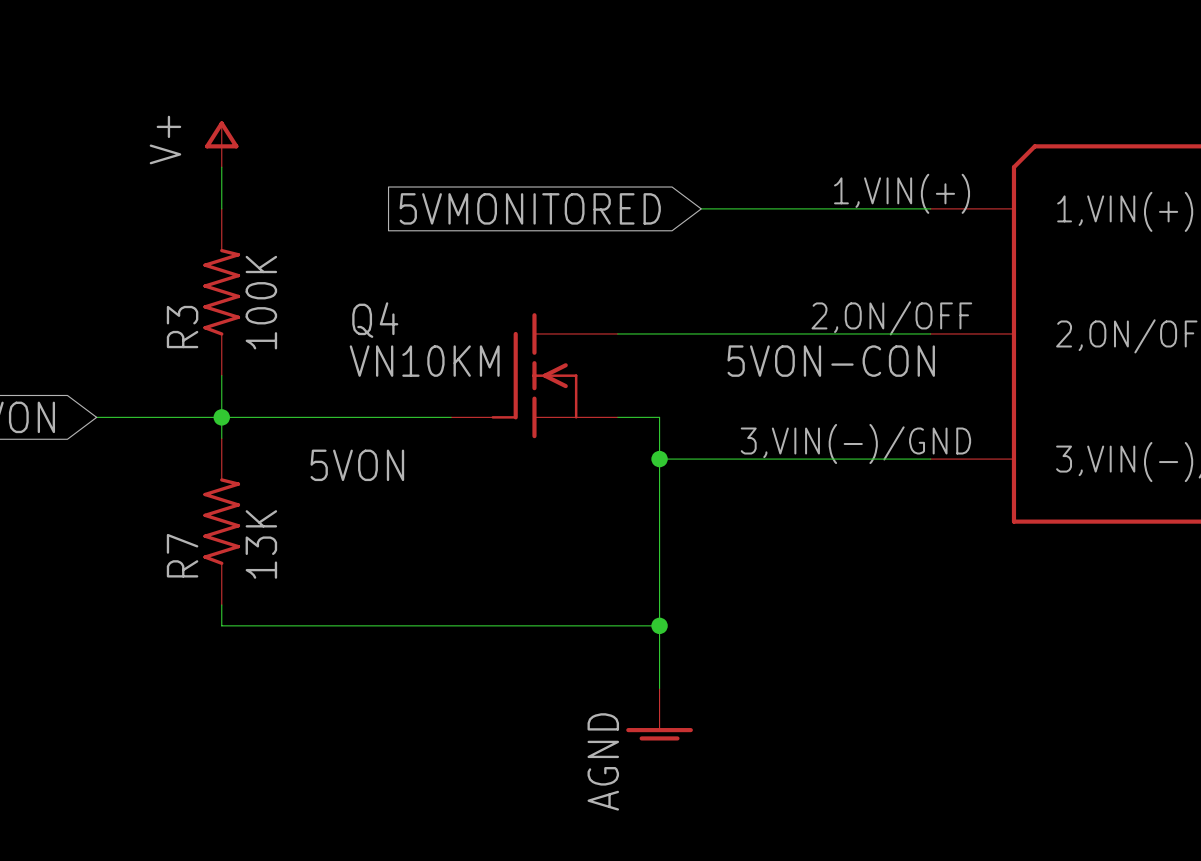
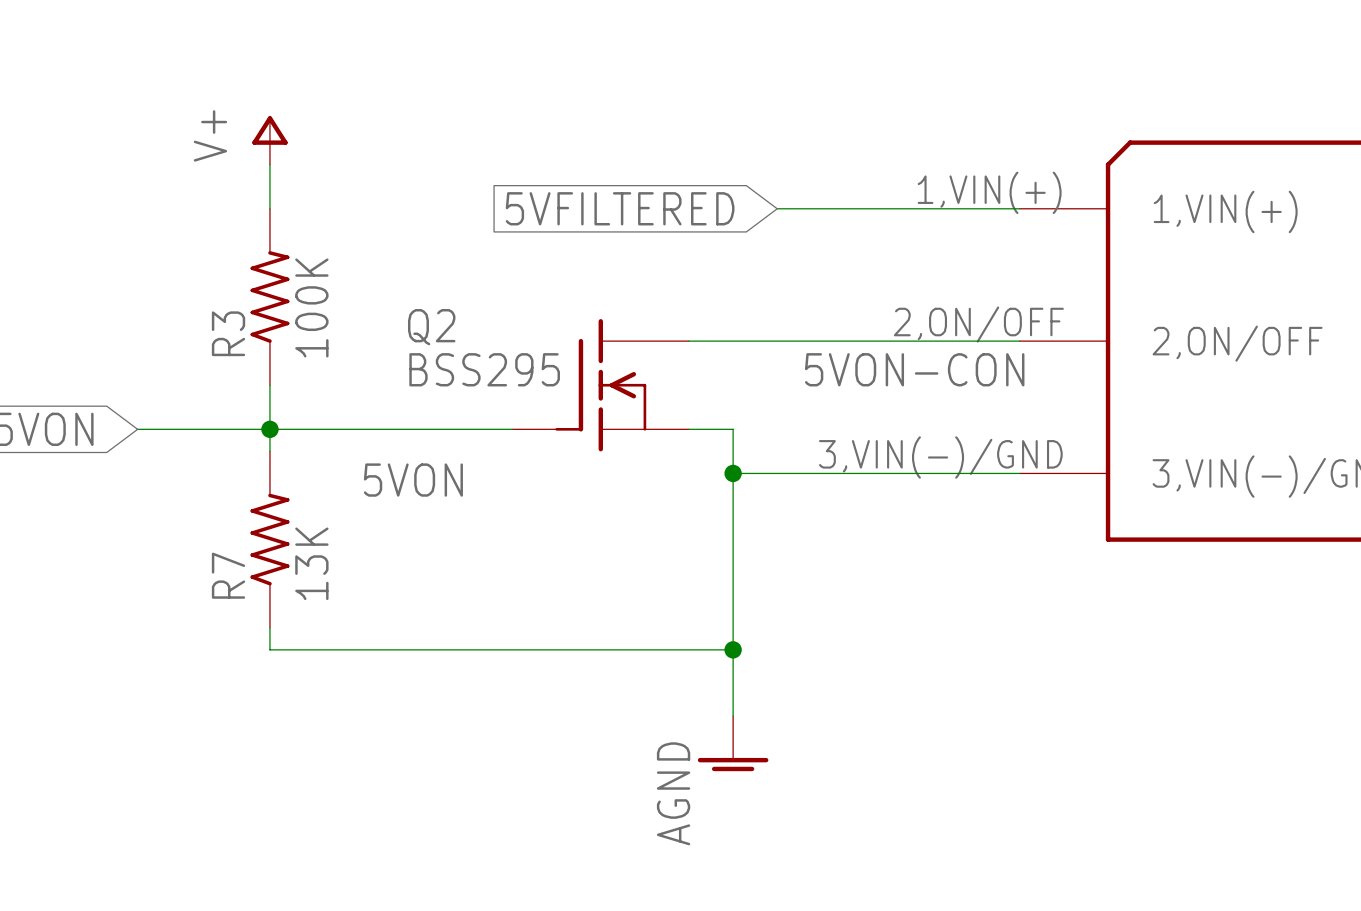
global label: 5VMONITORED (530, 208) -> 5VFILTERED (620, 208)
Q4 name: Q4 (375, 320) -> Q2 (431, 327)
Q4 value: VN10KM (424, 361) -> BSS295 (484, 369)

